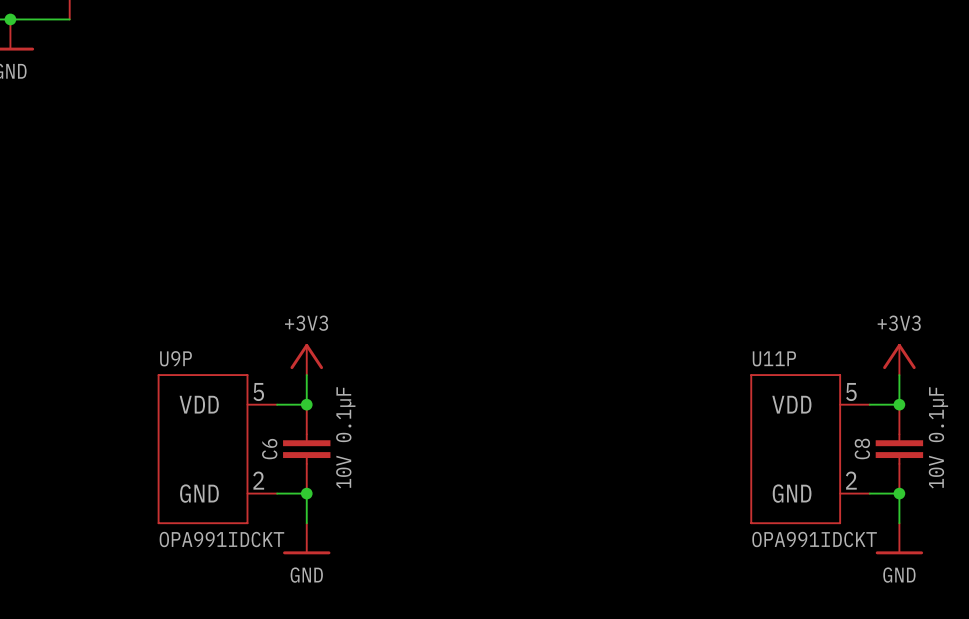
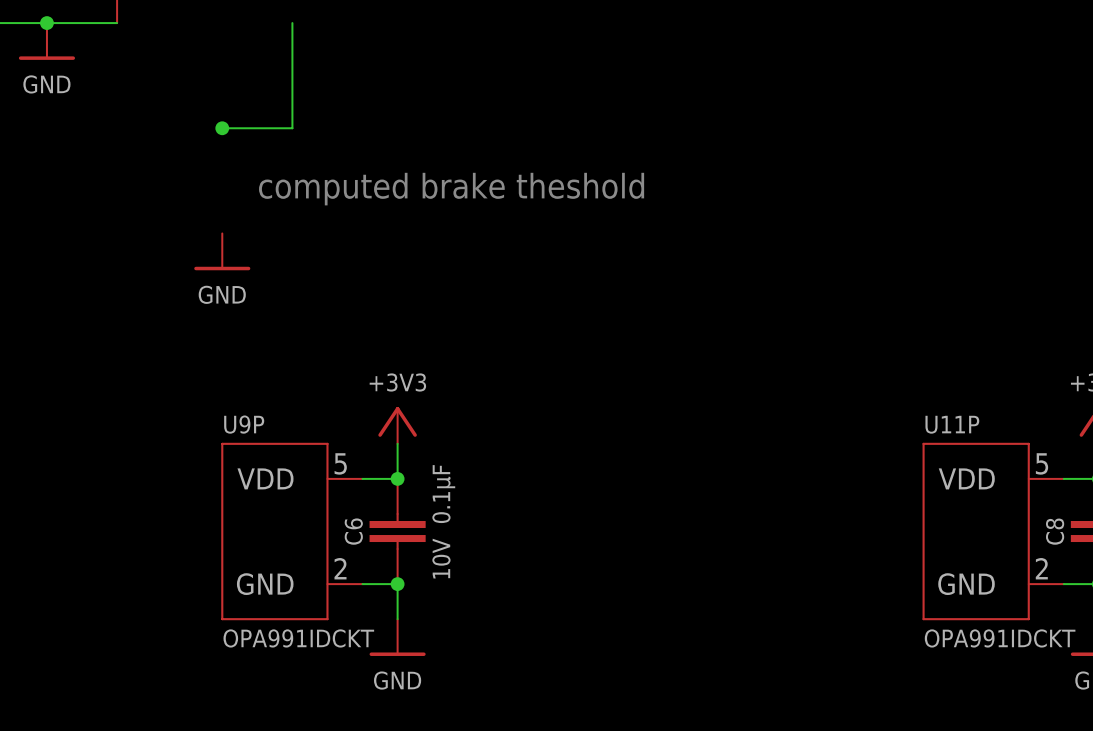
wire: none -> (292, 23) (292, 128) (222, 128)
junction: none -> (222, 128)
text: none -> computed brake theshold (451, 189)
power symbol: none -> GND (222, 251)

